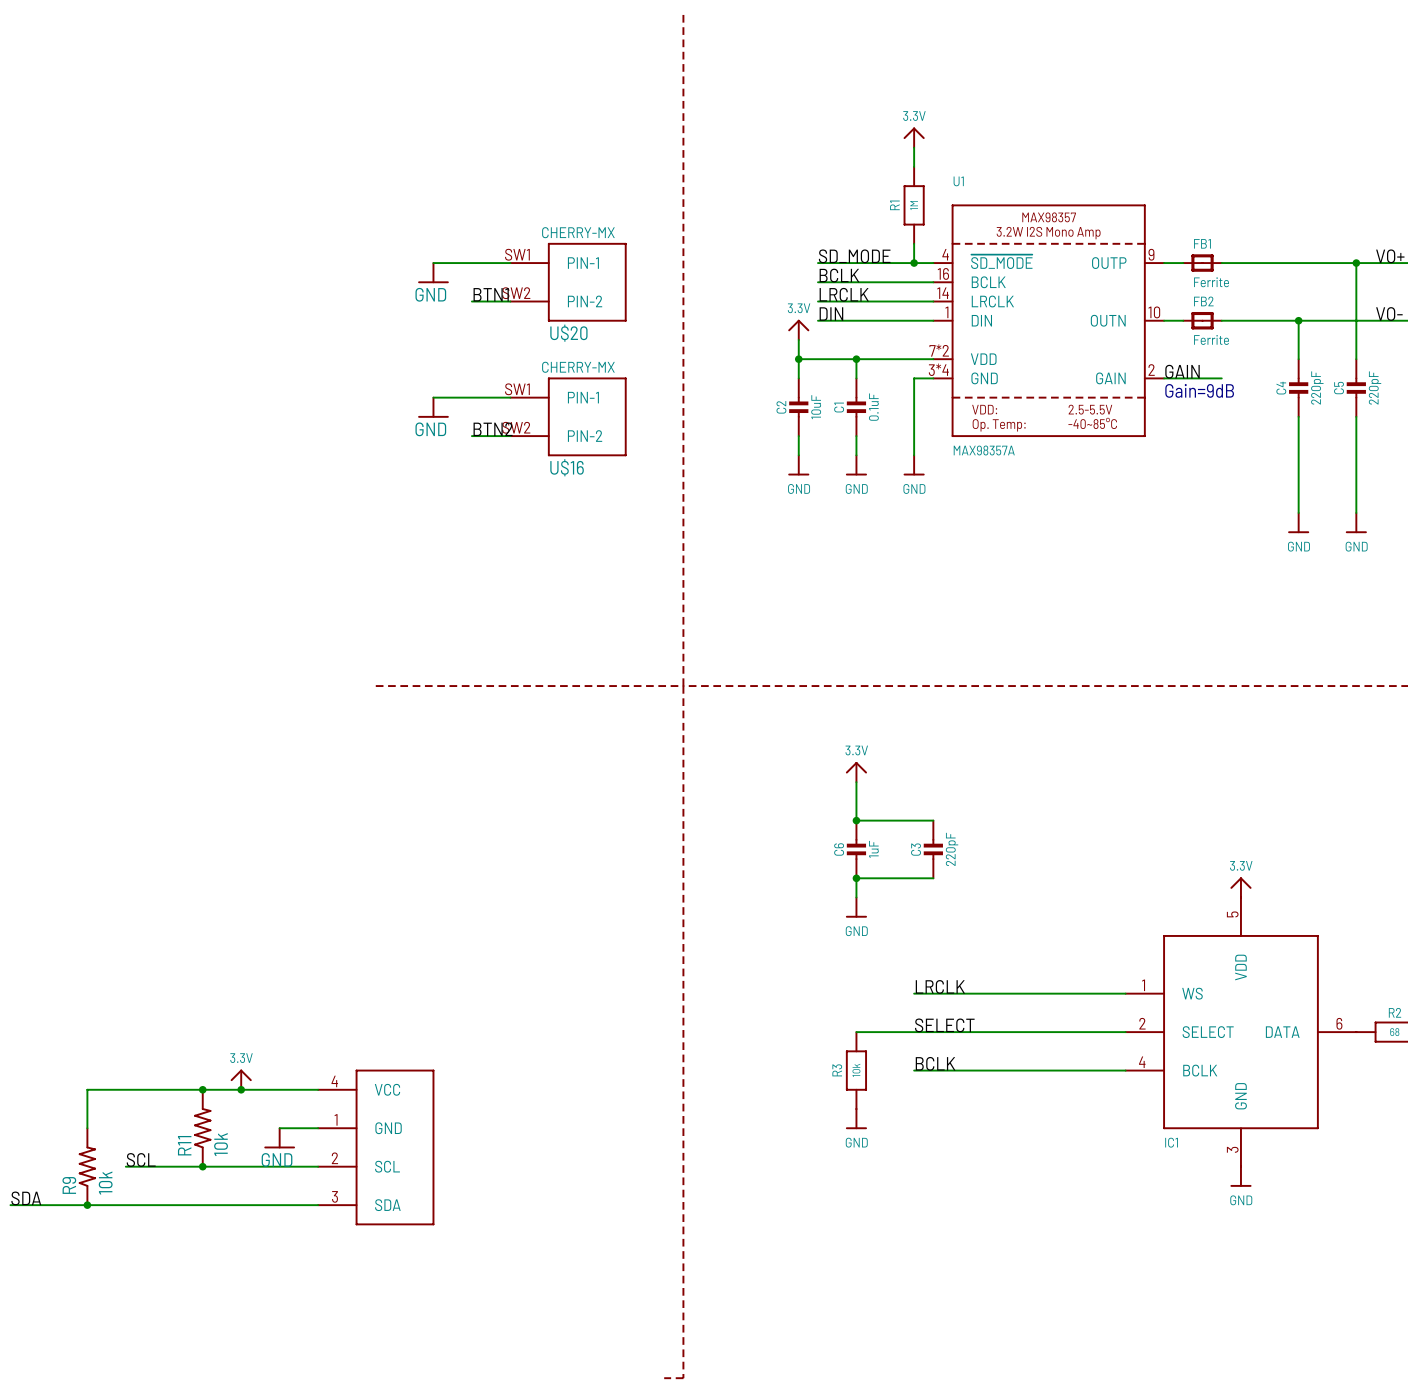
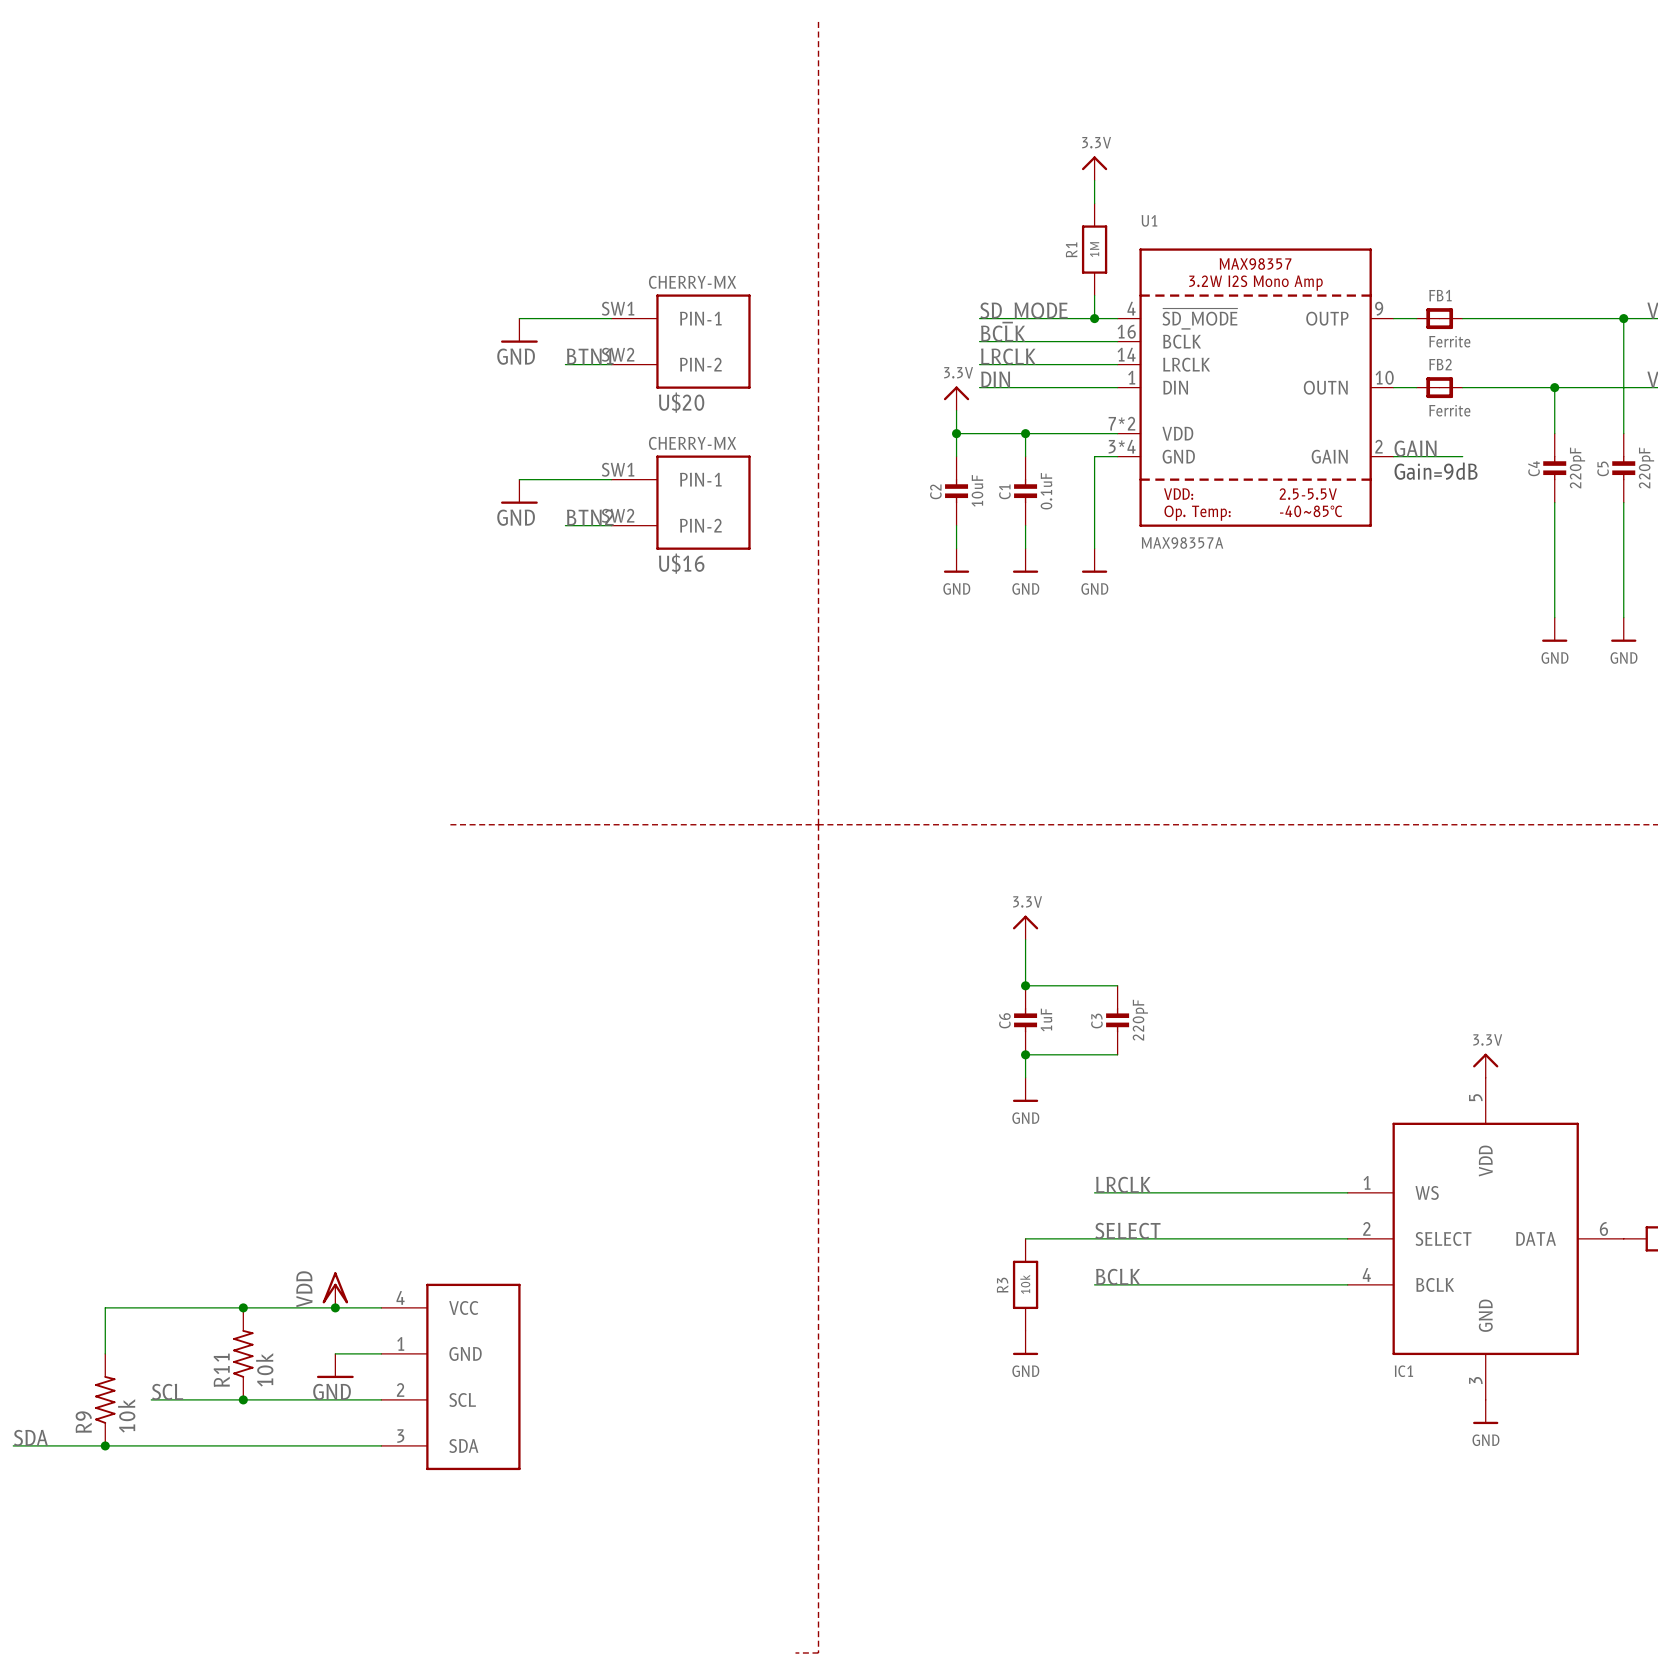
power symbol: none -> VDD (335, 1290)
power symbol: 3.3V (241, 1079) -> none
junction position: (241, 1089) -> (335, 1307)

